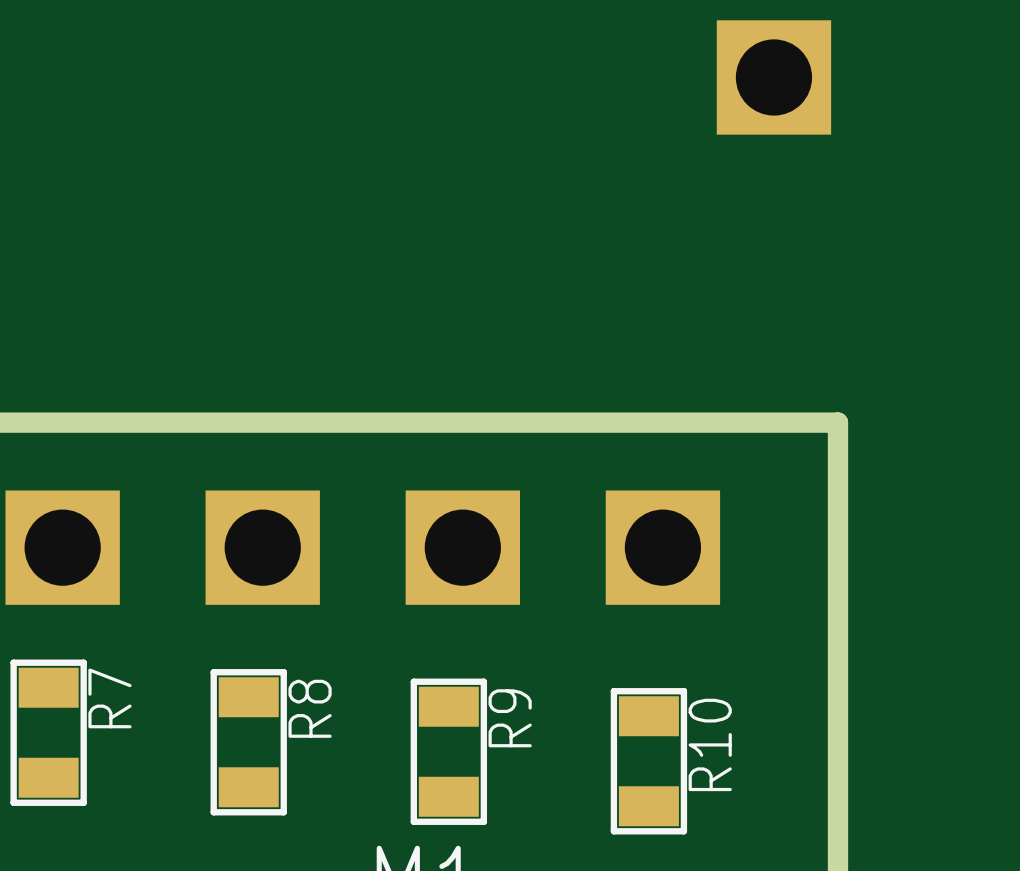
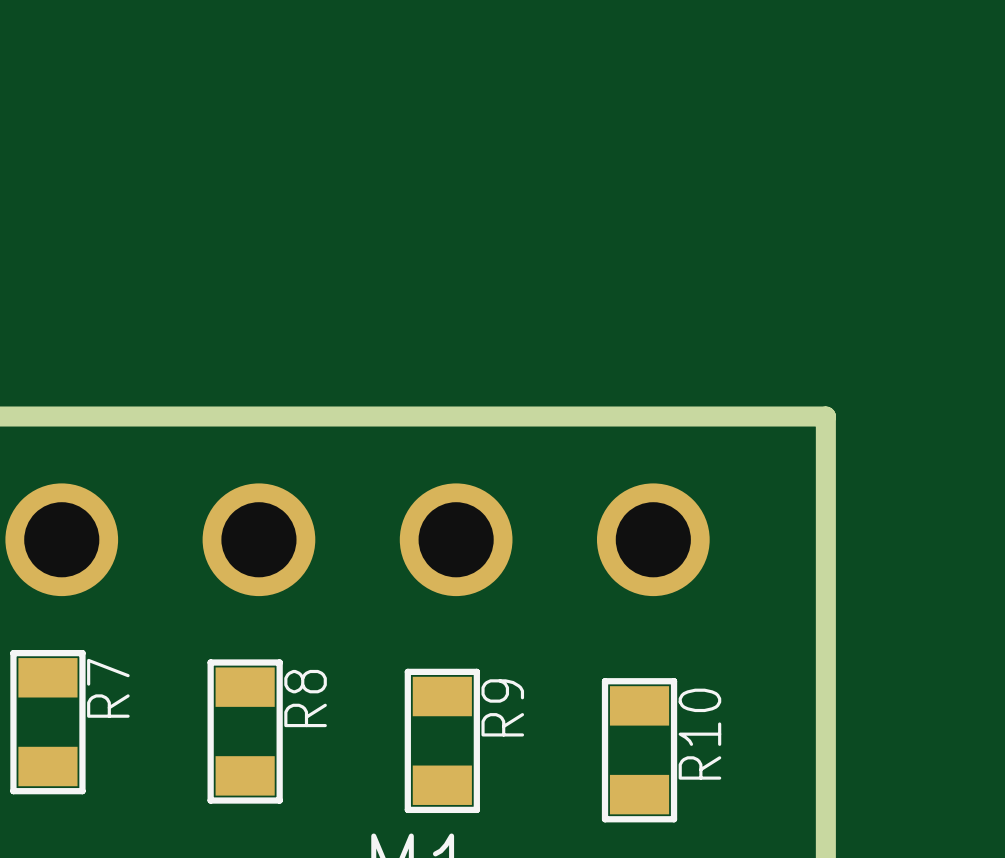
part: (773, 77) -> none
part footprint: [5, 490, 120, 605] -> [5, 483, 119, 597]
part footprint: [205, 490, 320, 605] -> [202, 483, 316, 597]
part footprint: [405, 490, 521, 605] -> [399, 483, 513, 597]
part footprint: [605, 490, 721, 605] -> [596, 483, 710, 597]

